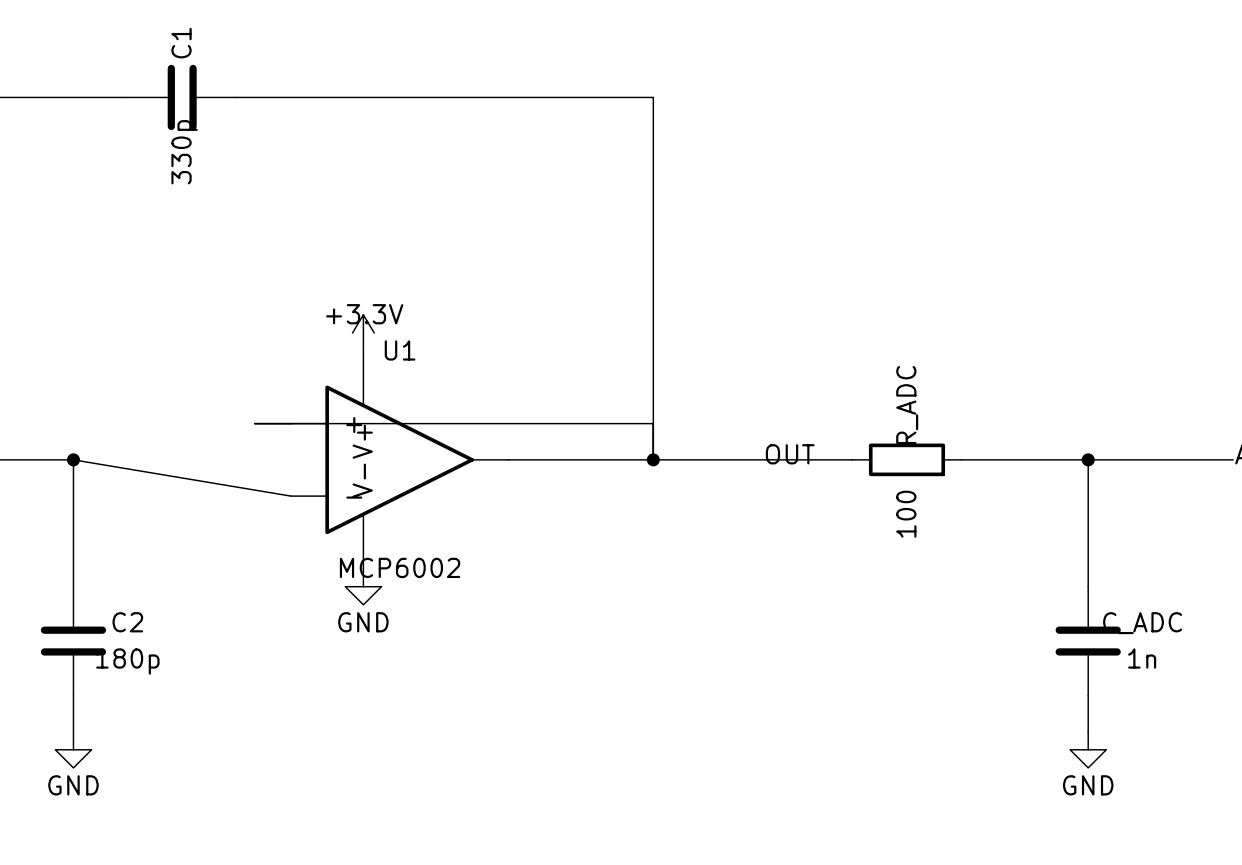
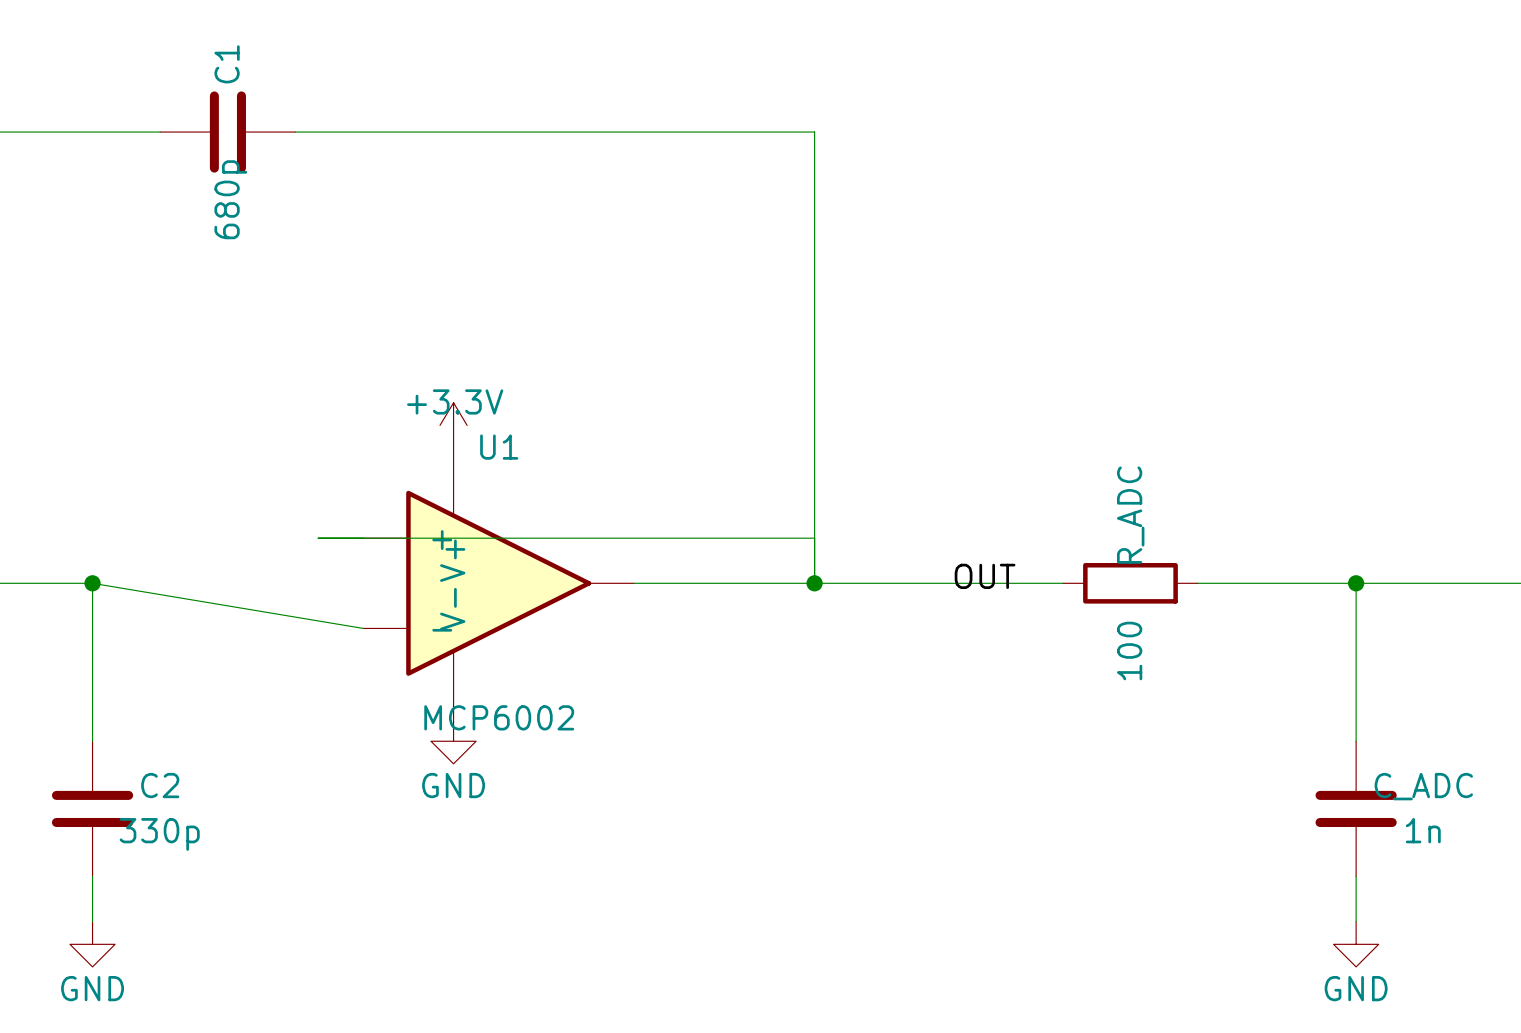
C1 value: 330p (184, 152) -> 680p (230, 199)
C2 value: 180p (127, 661) -> 330p (159, 834)

